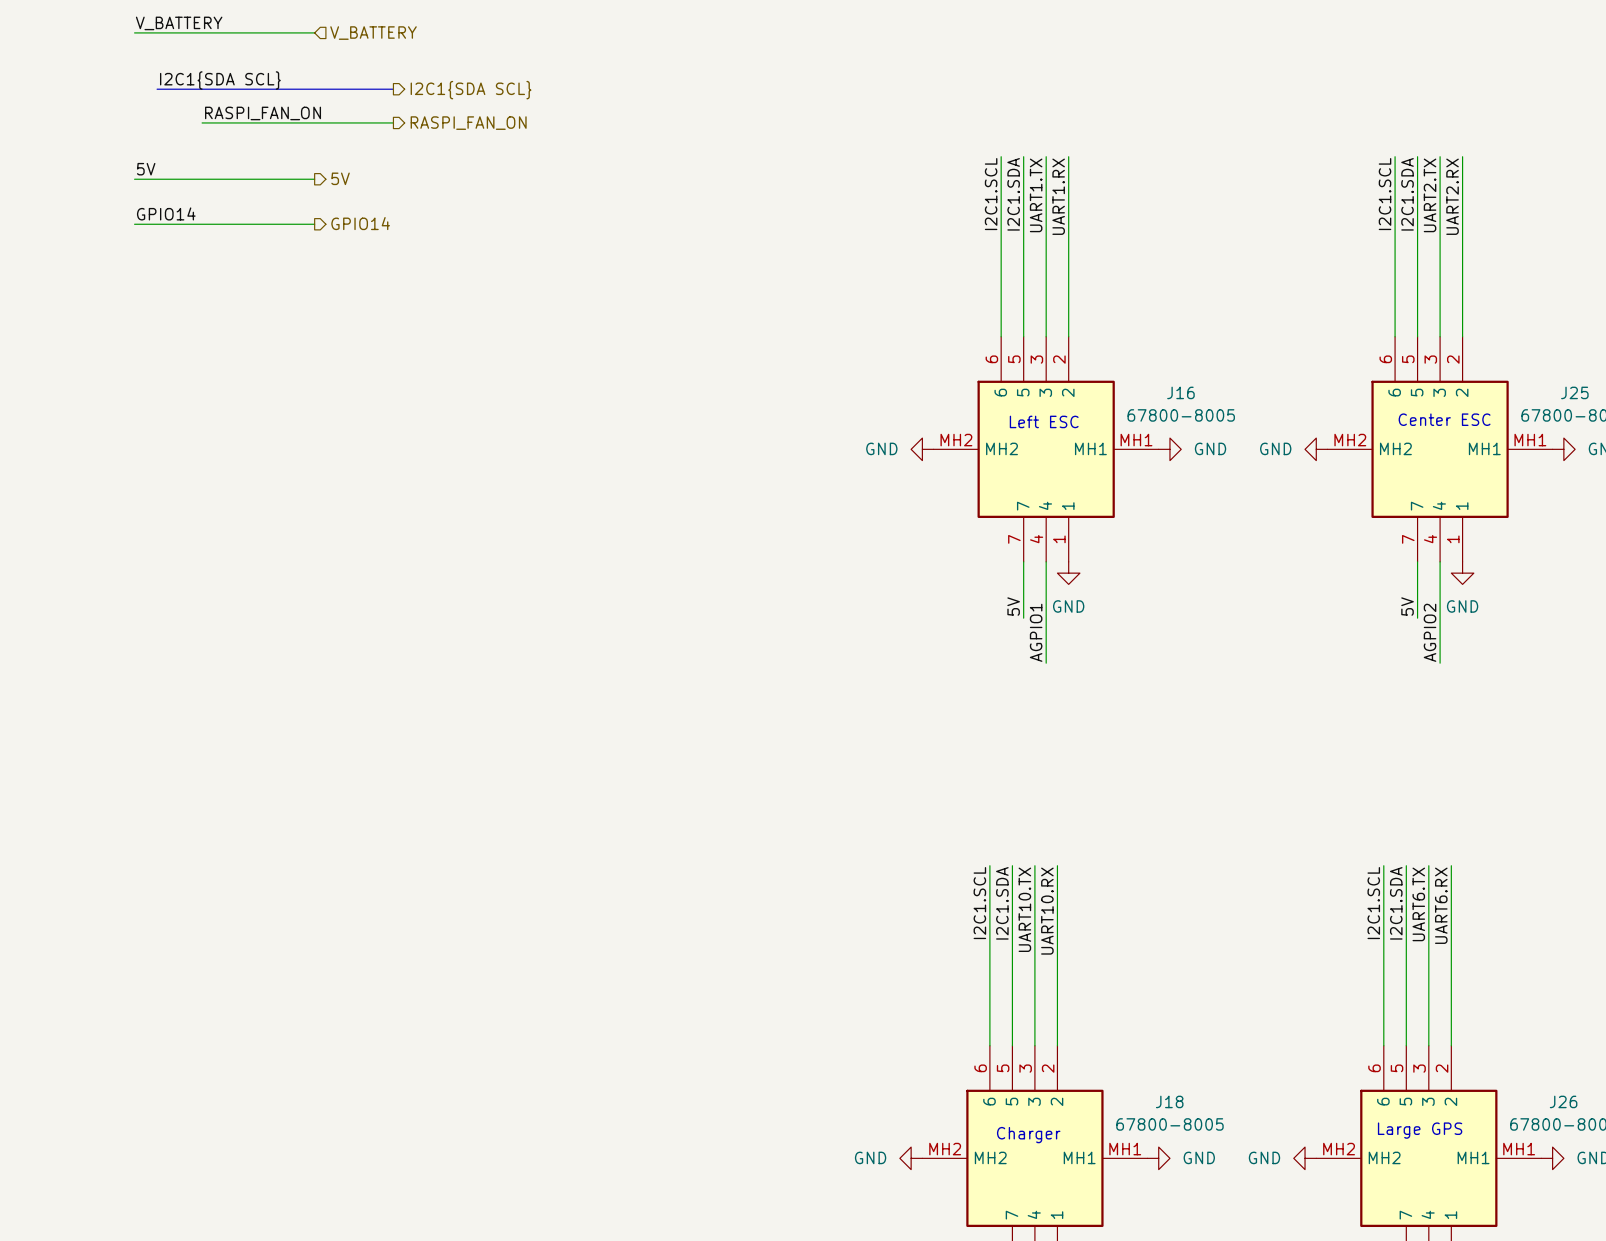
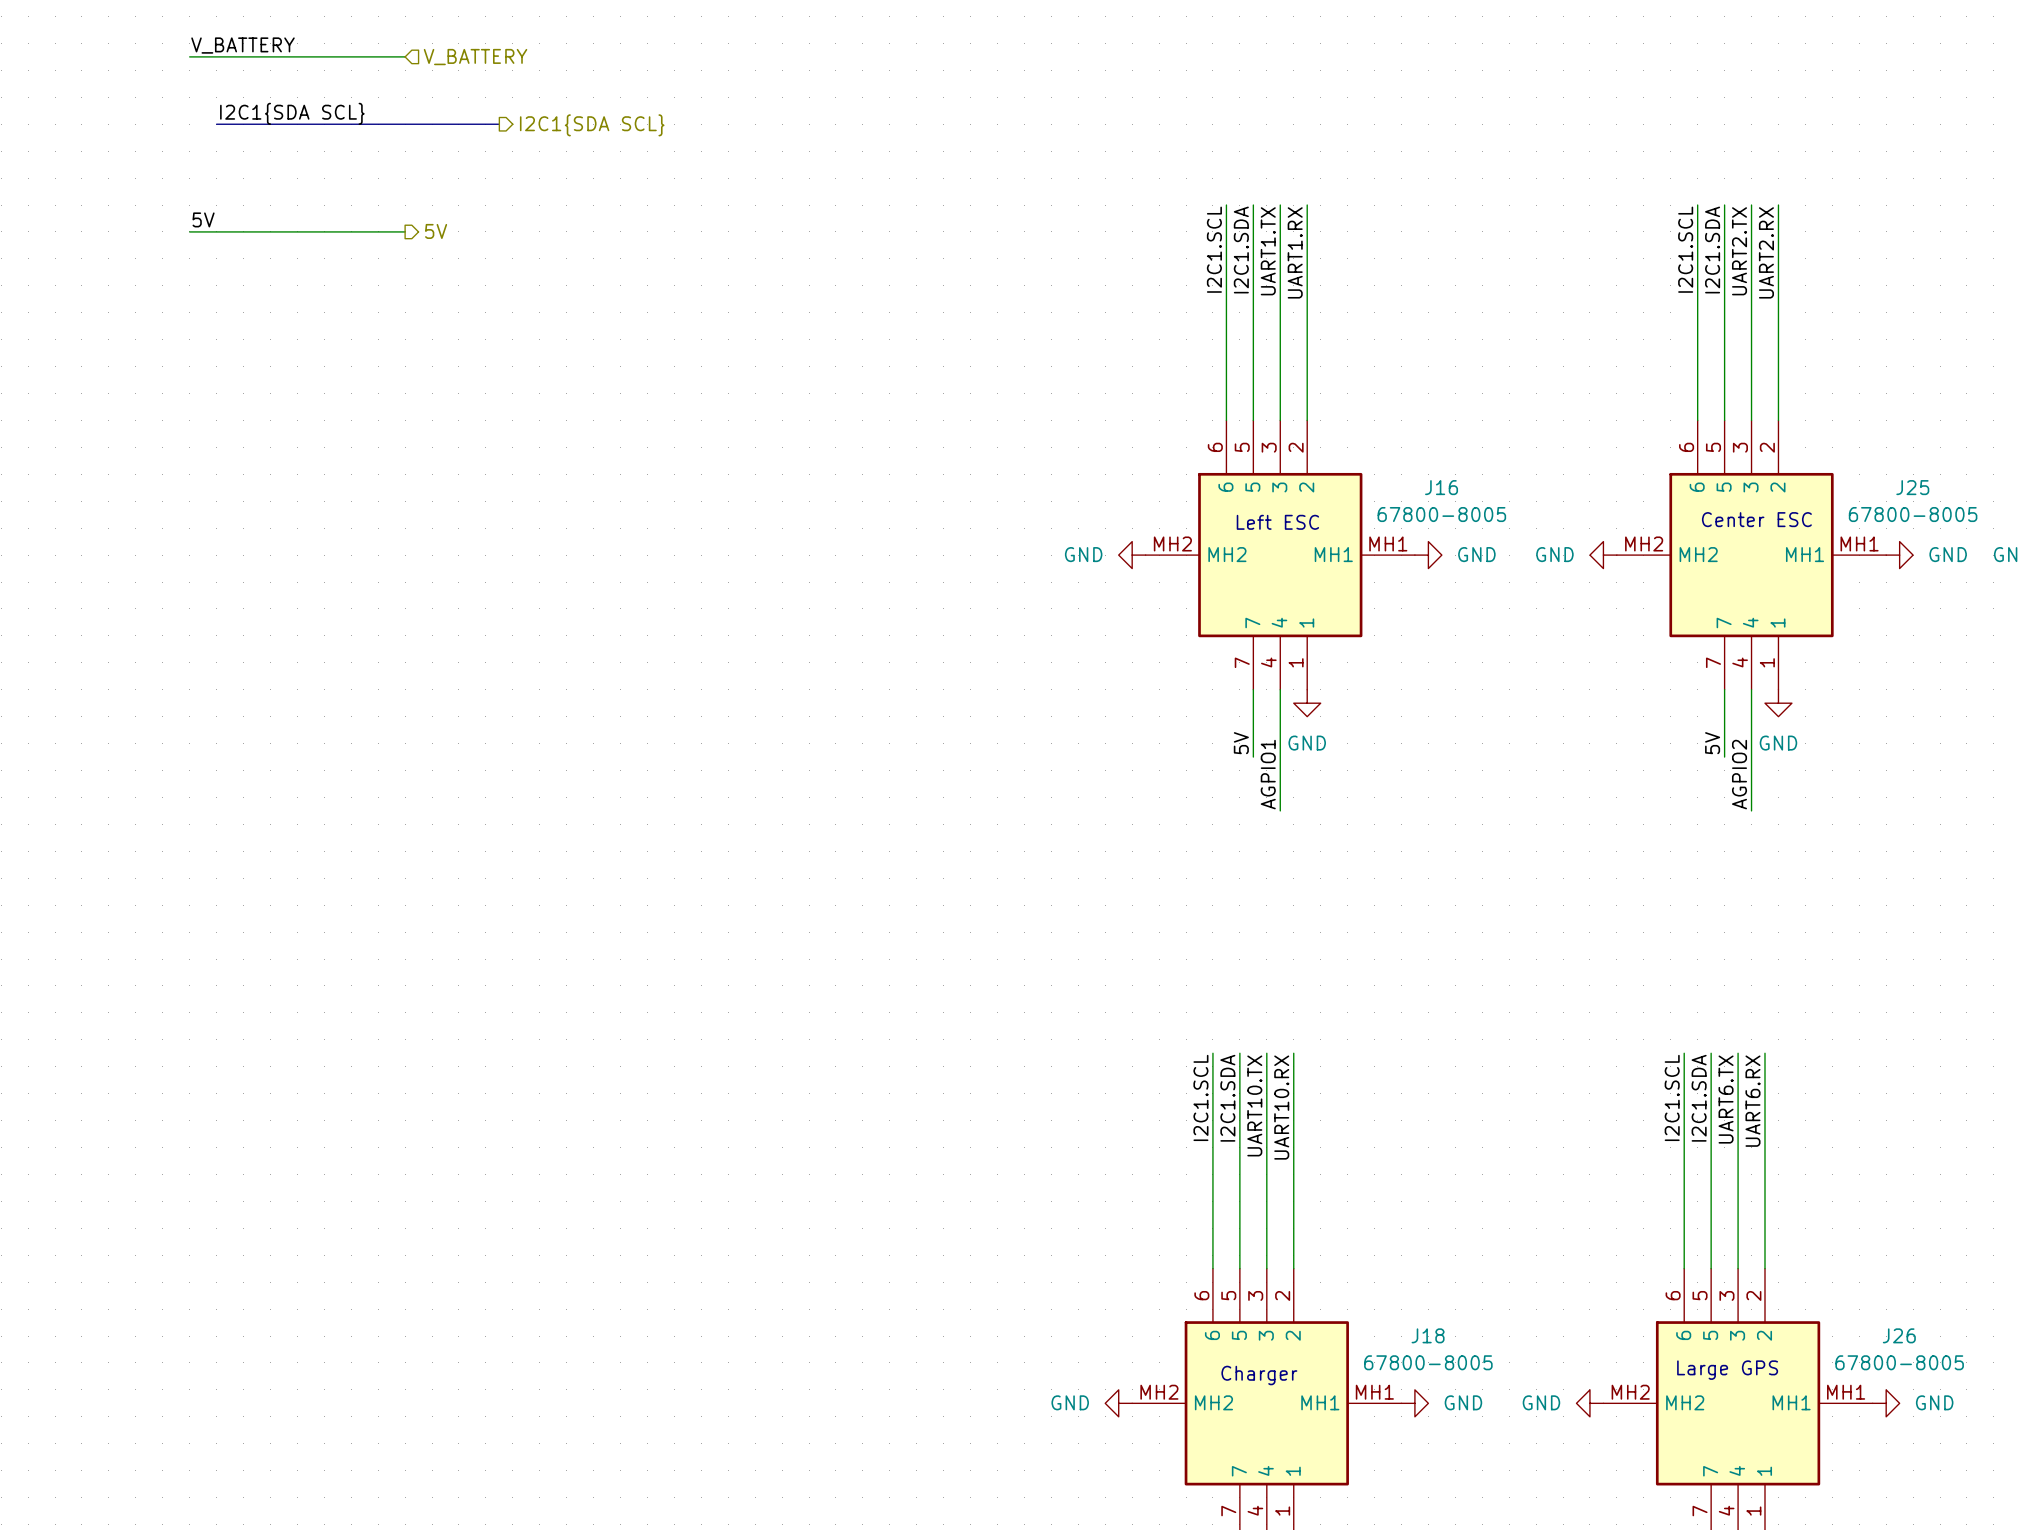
label: RASPI_FAN_ON (263, 113) -> none
wire: (202, 122) (393, 122) -> none
hierarchical label: RASPI_FAN_ON (468, 123) -> none
label: GPIO14 (166, 213) -> none
hierarchical label: GPIO14 (360, 223) -> none
wire: (134, 224) (314, 224) -> none

